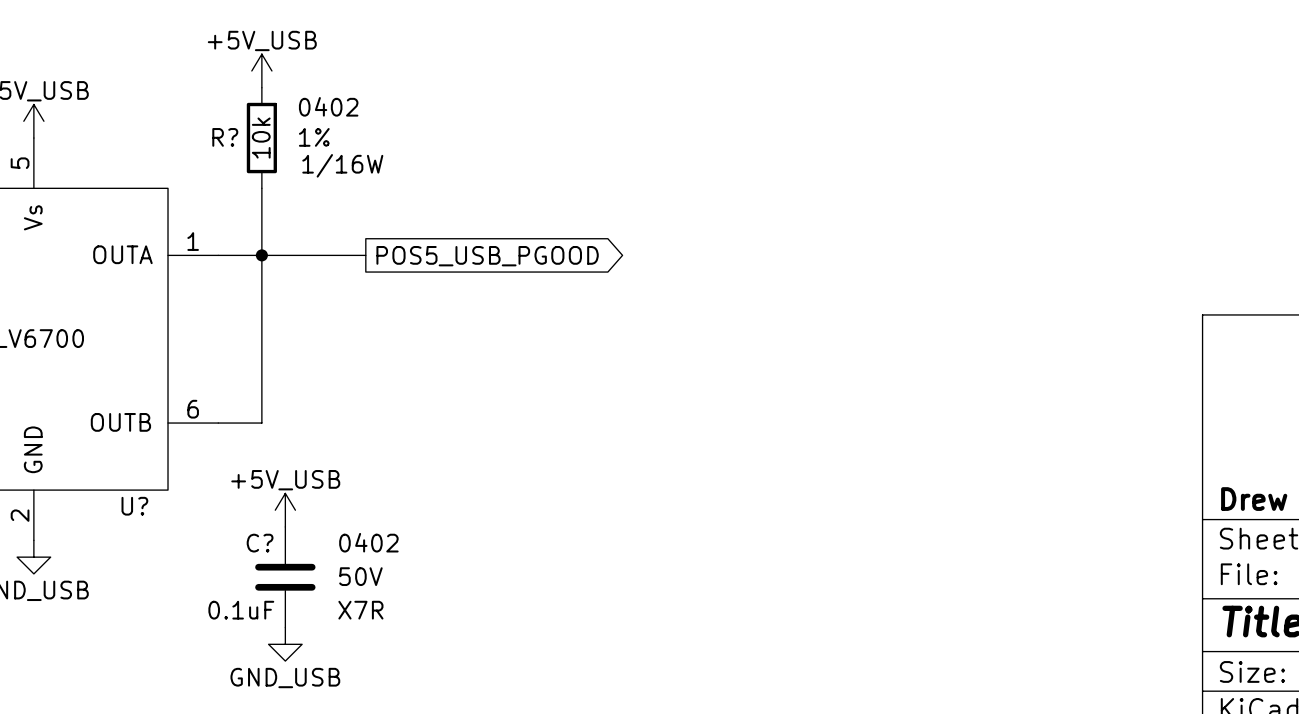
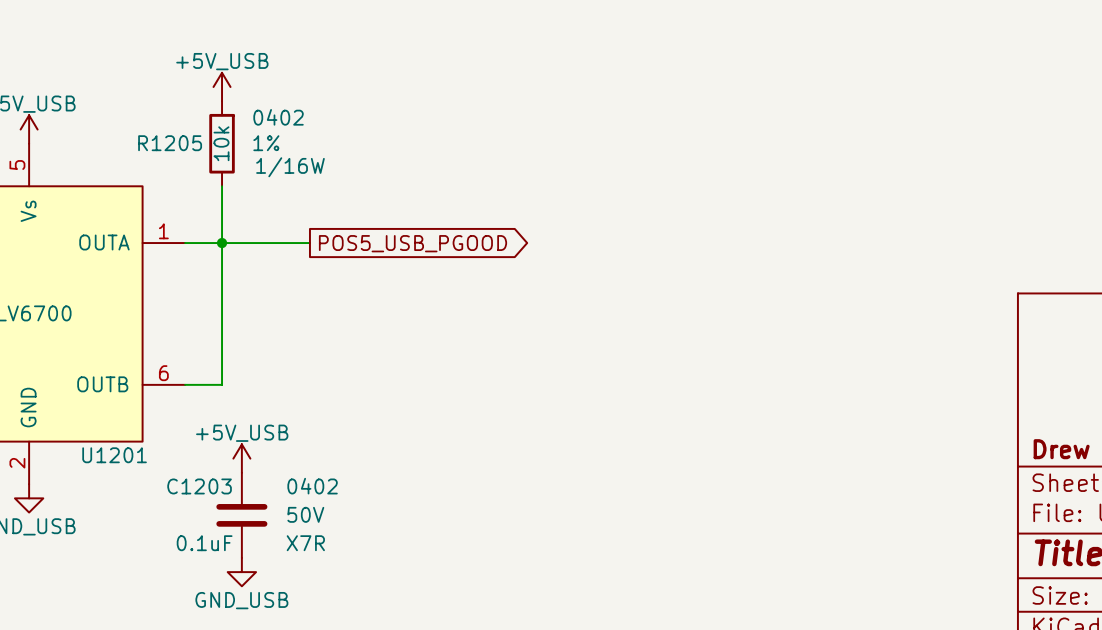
R? name: R? (225, 137) -> R1205 (170, 143)
U? name: U? (134, 506) -> U1201 (114, 455)
C? name: C? (260, 543) -> C1203 (199, 486)

